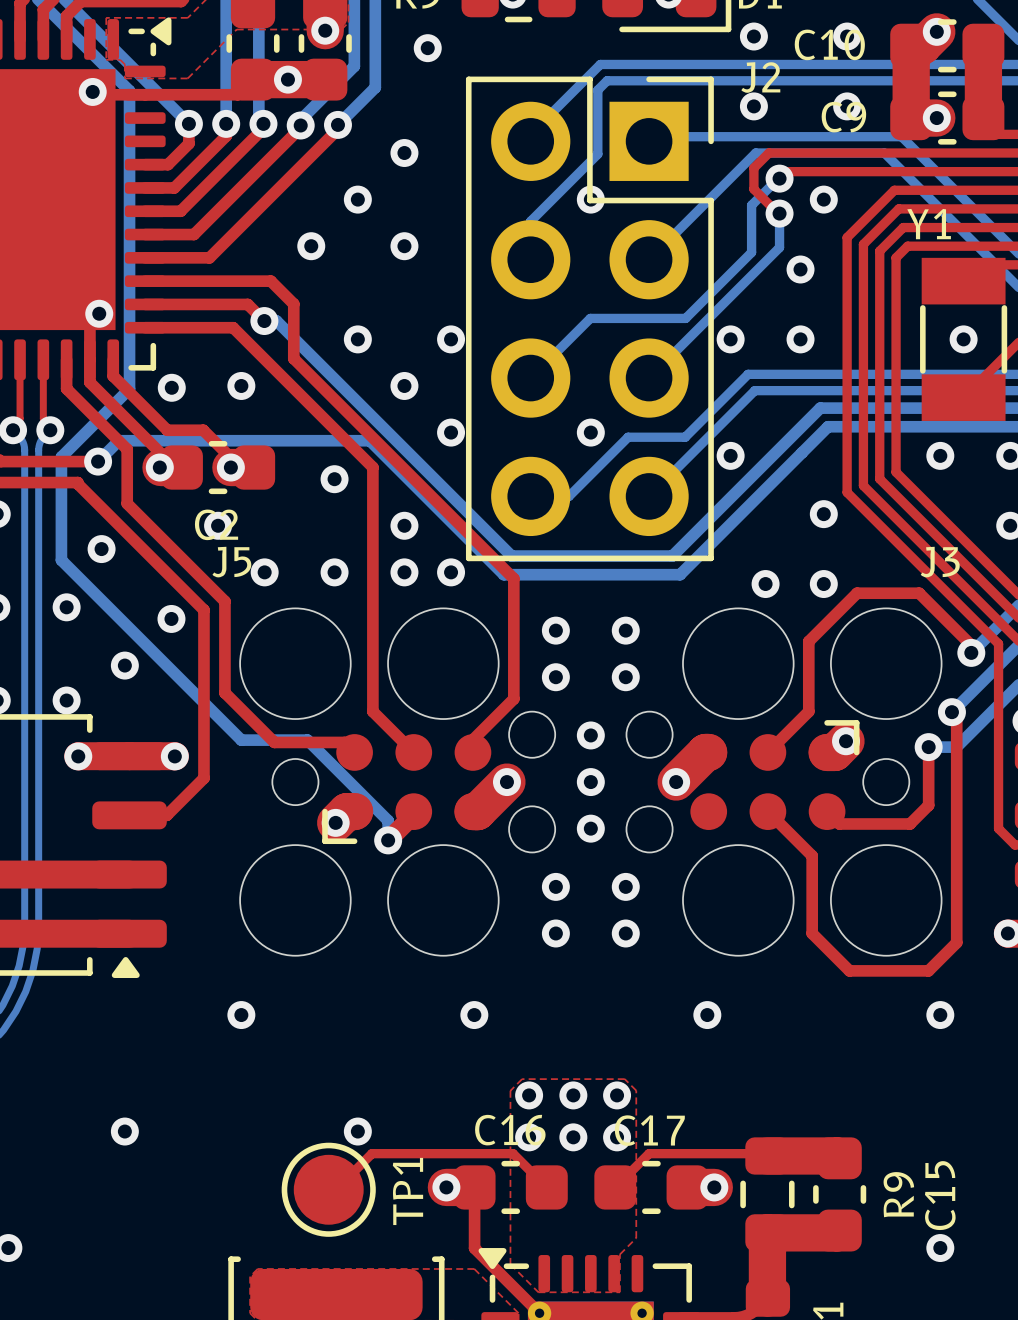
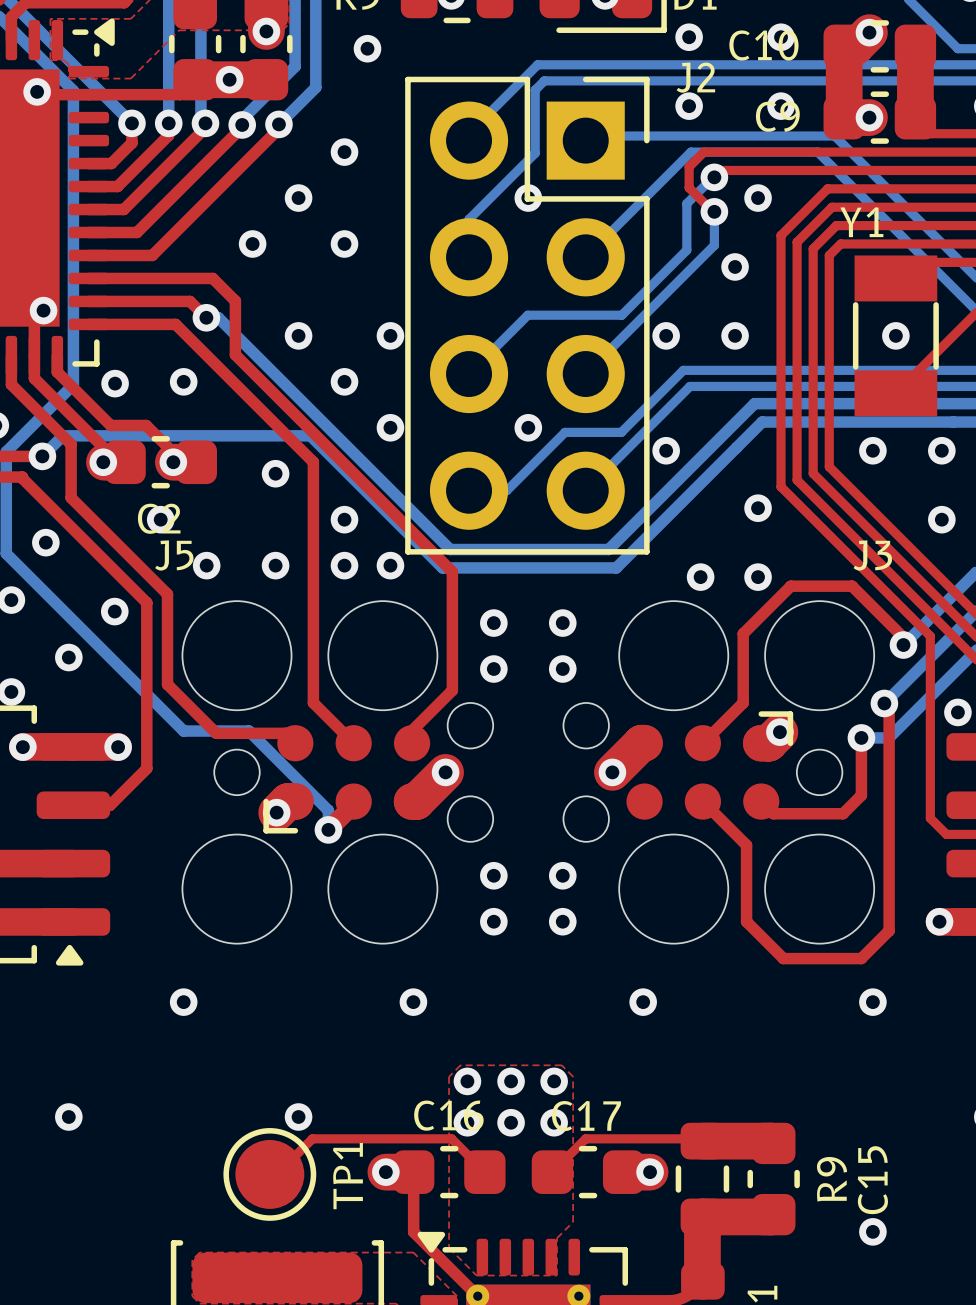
via: (590, 735) -> none
via: (590, 782) -> none
via: (590, 828) -> none

